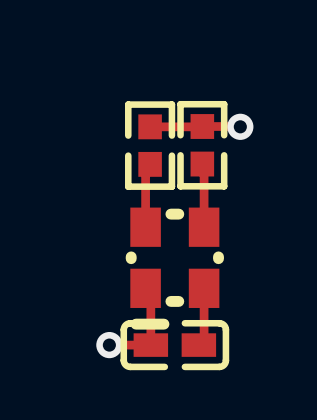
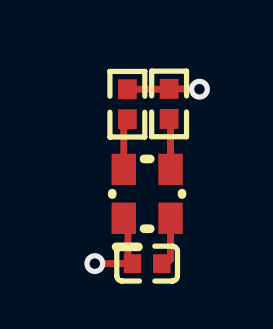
part footprint: [120, 319, 230, 371] -> [114, 243, 181, 284]

